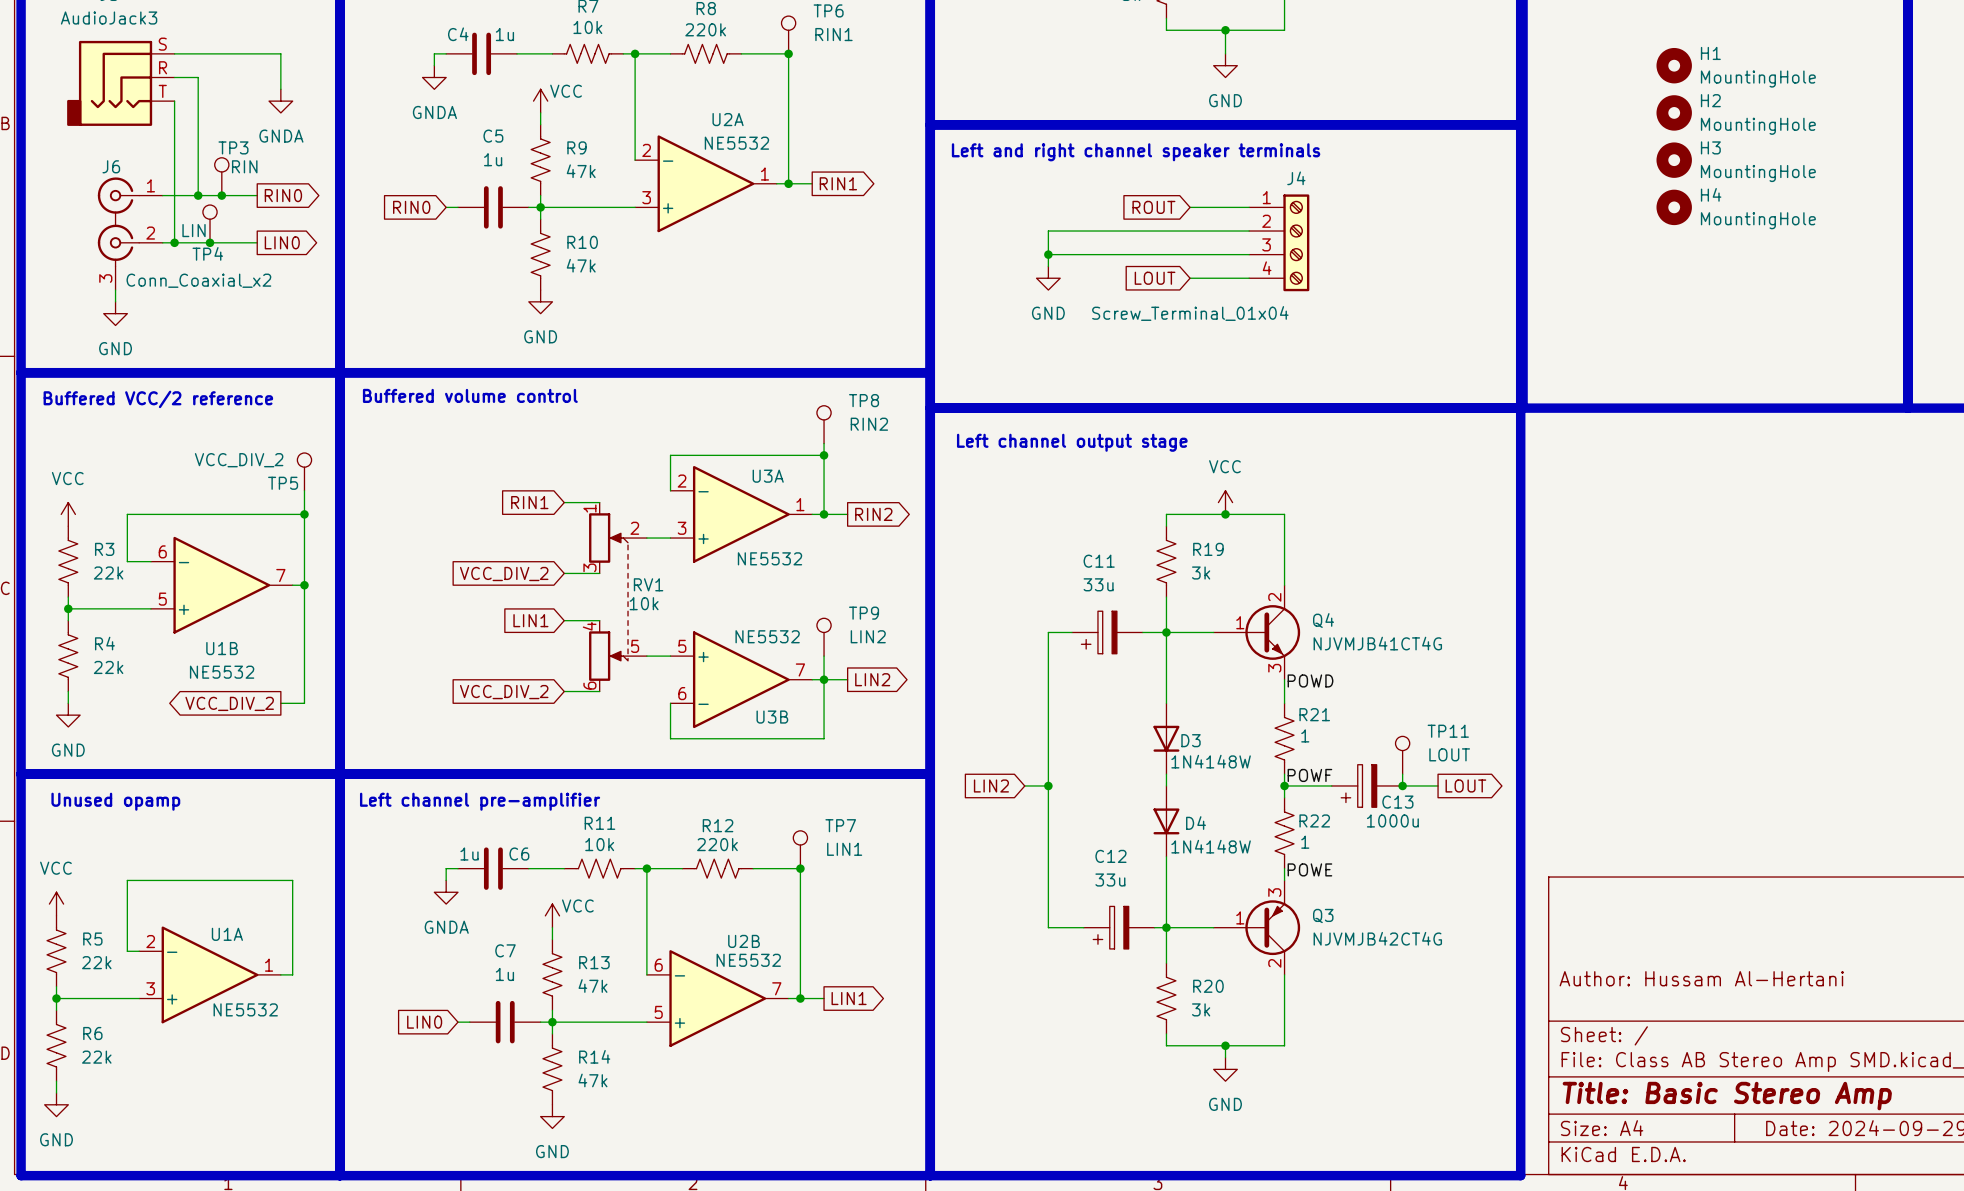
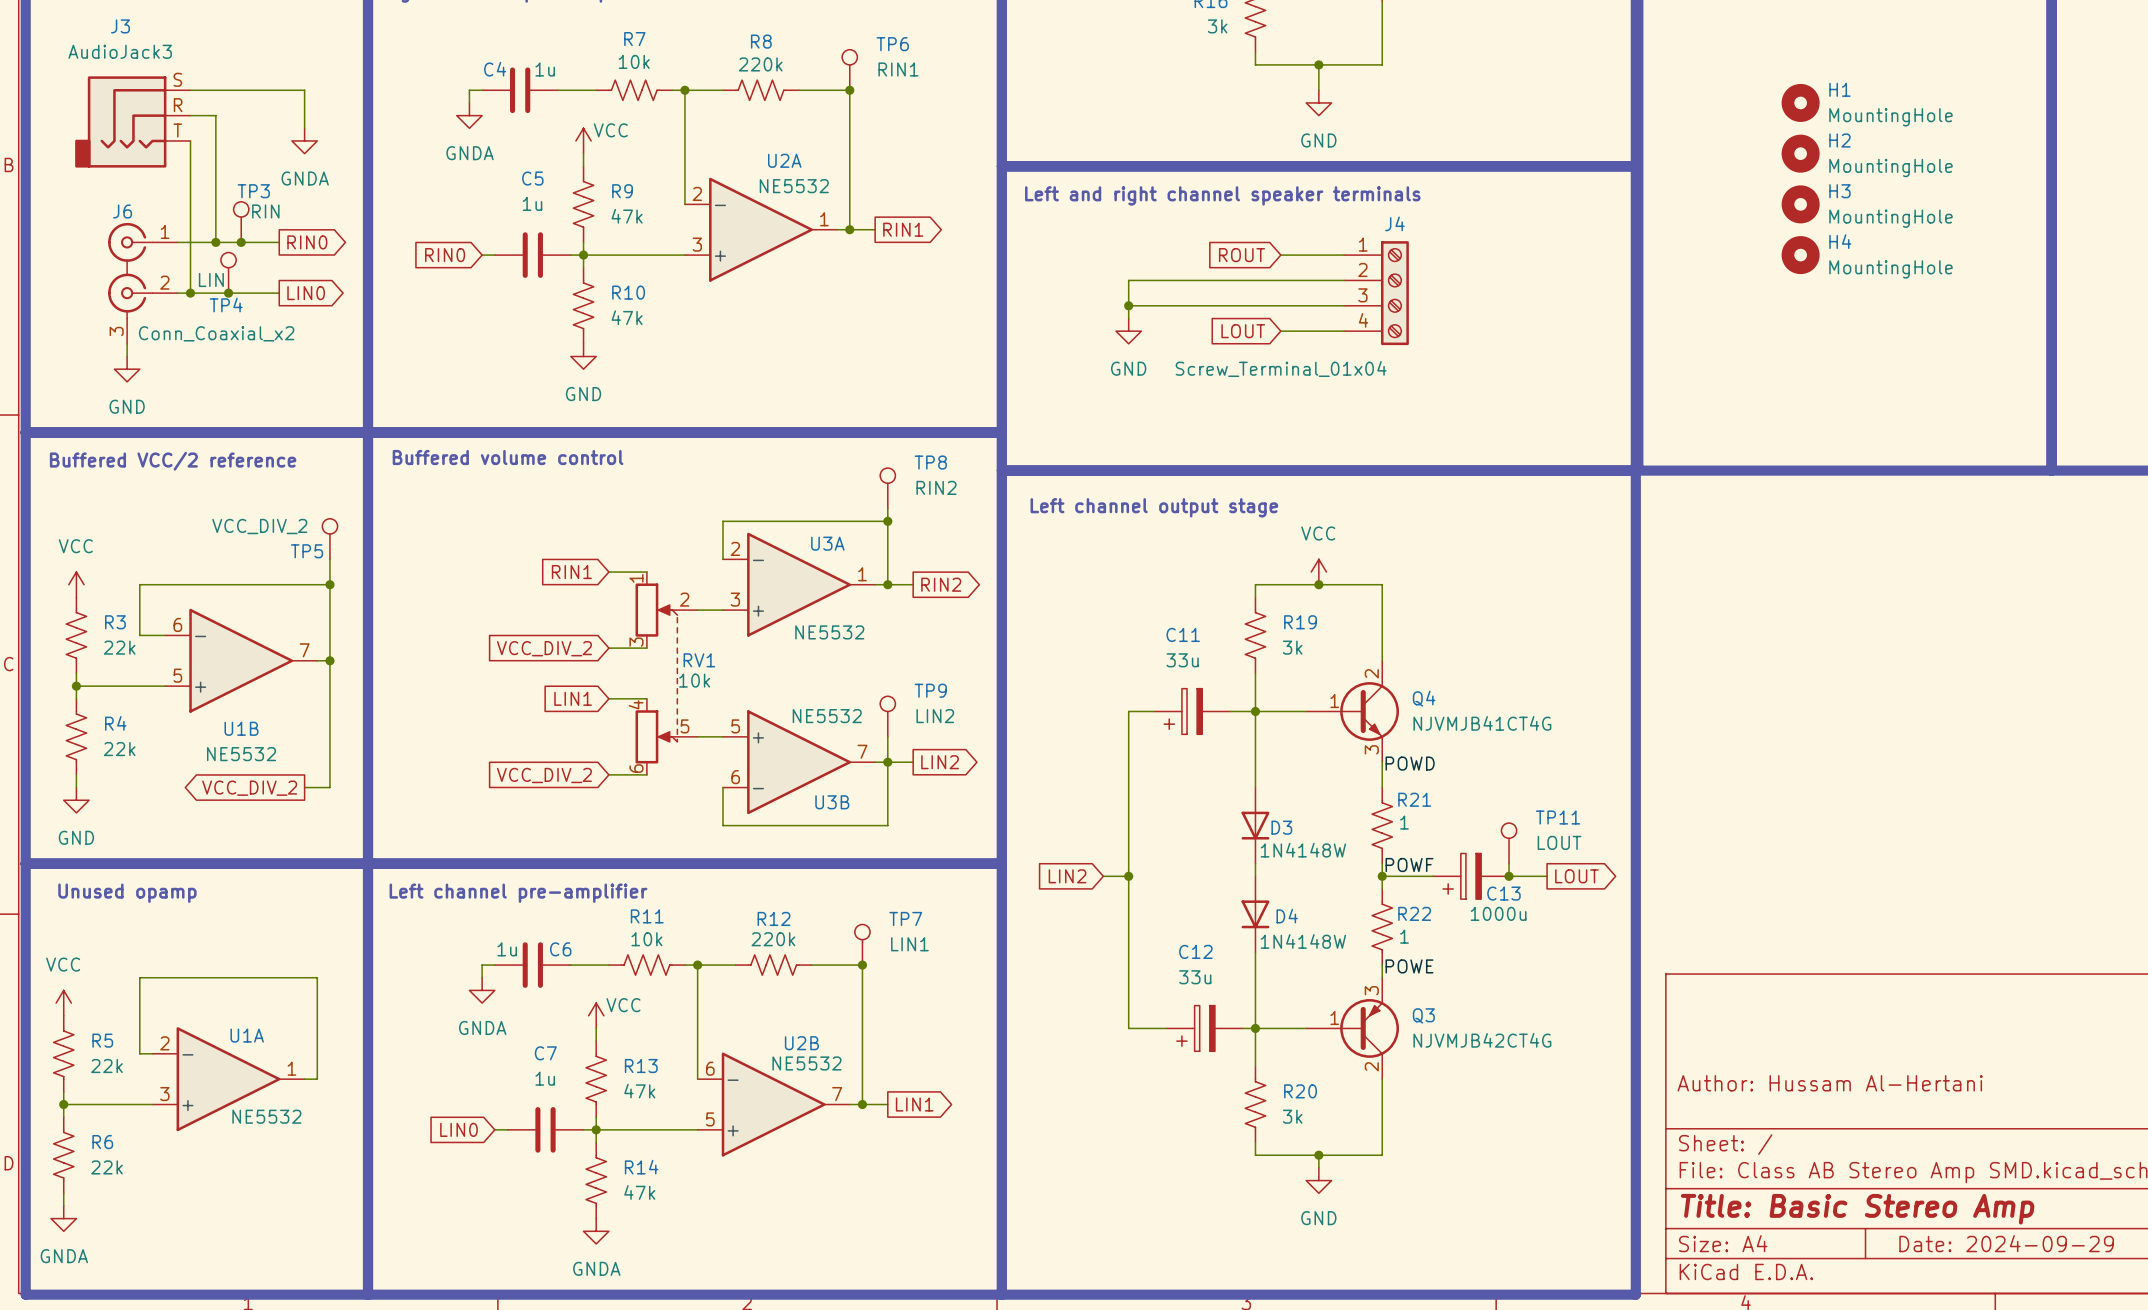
power symbol: GND (56, 1104) -> GNDA (63, 1218)
power symbol: GND (552, 1116) -> GNDA (596, 1231)

